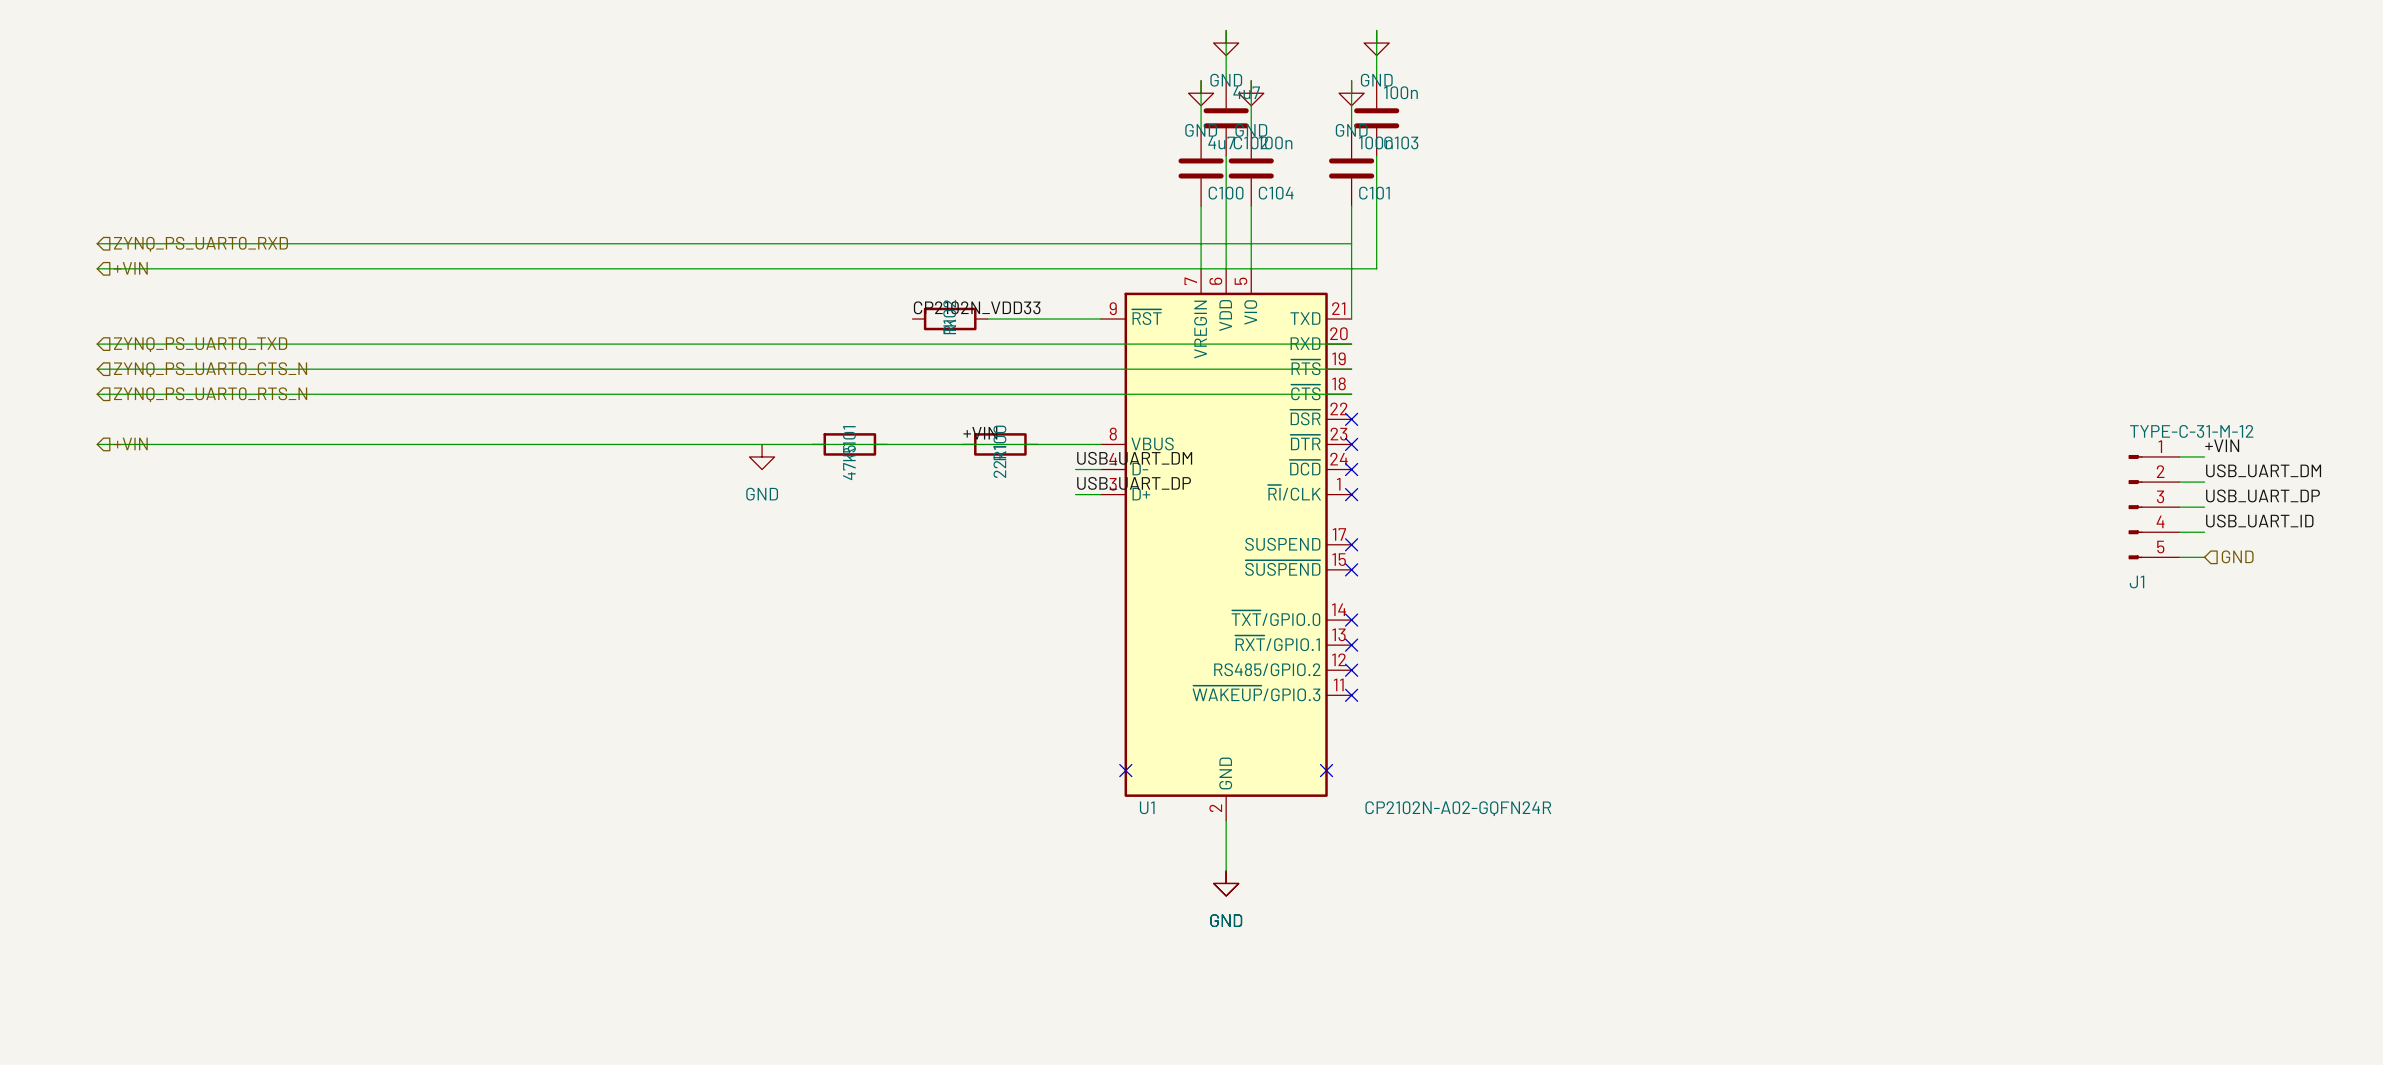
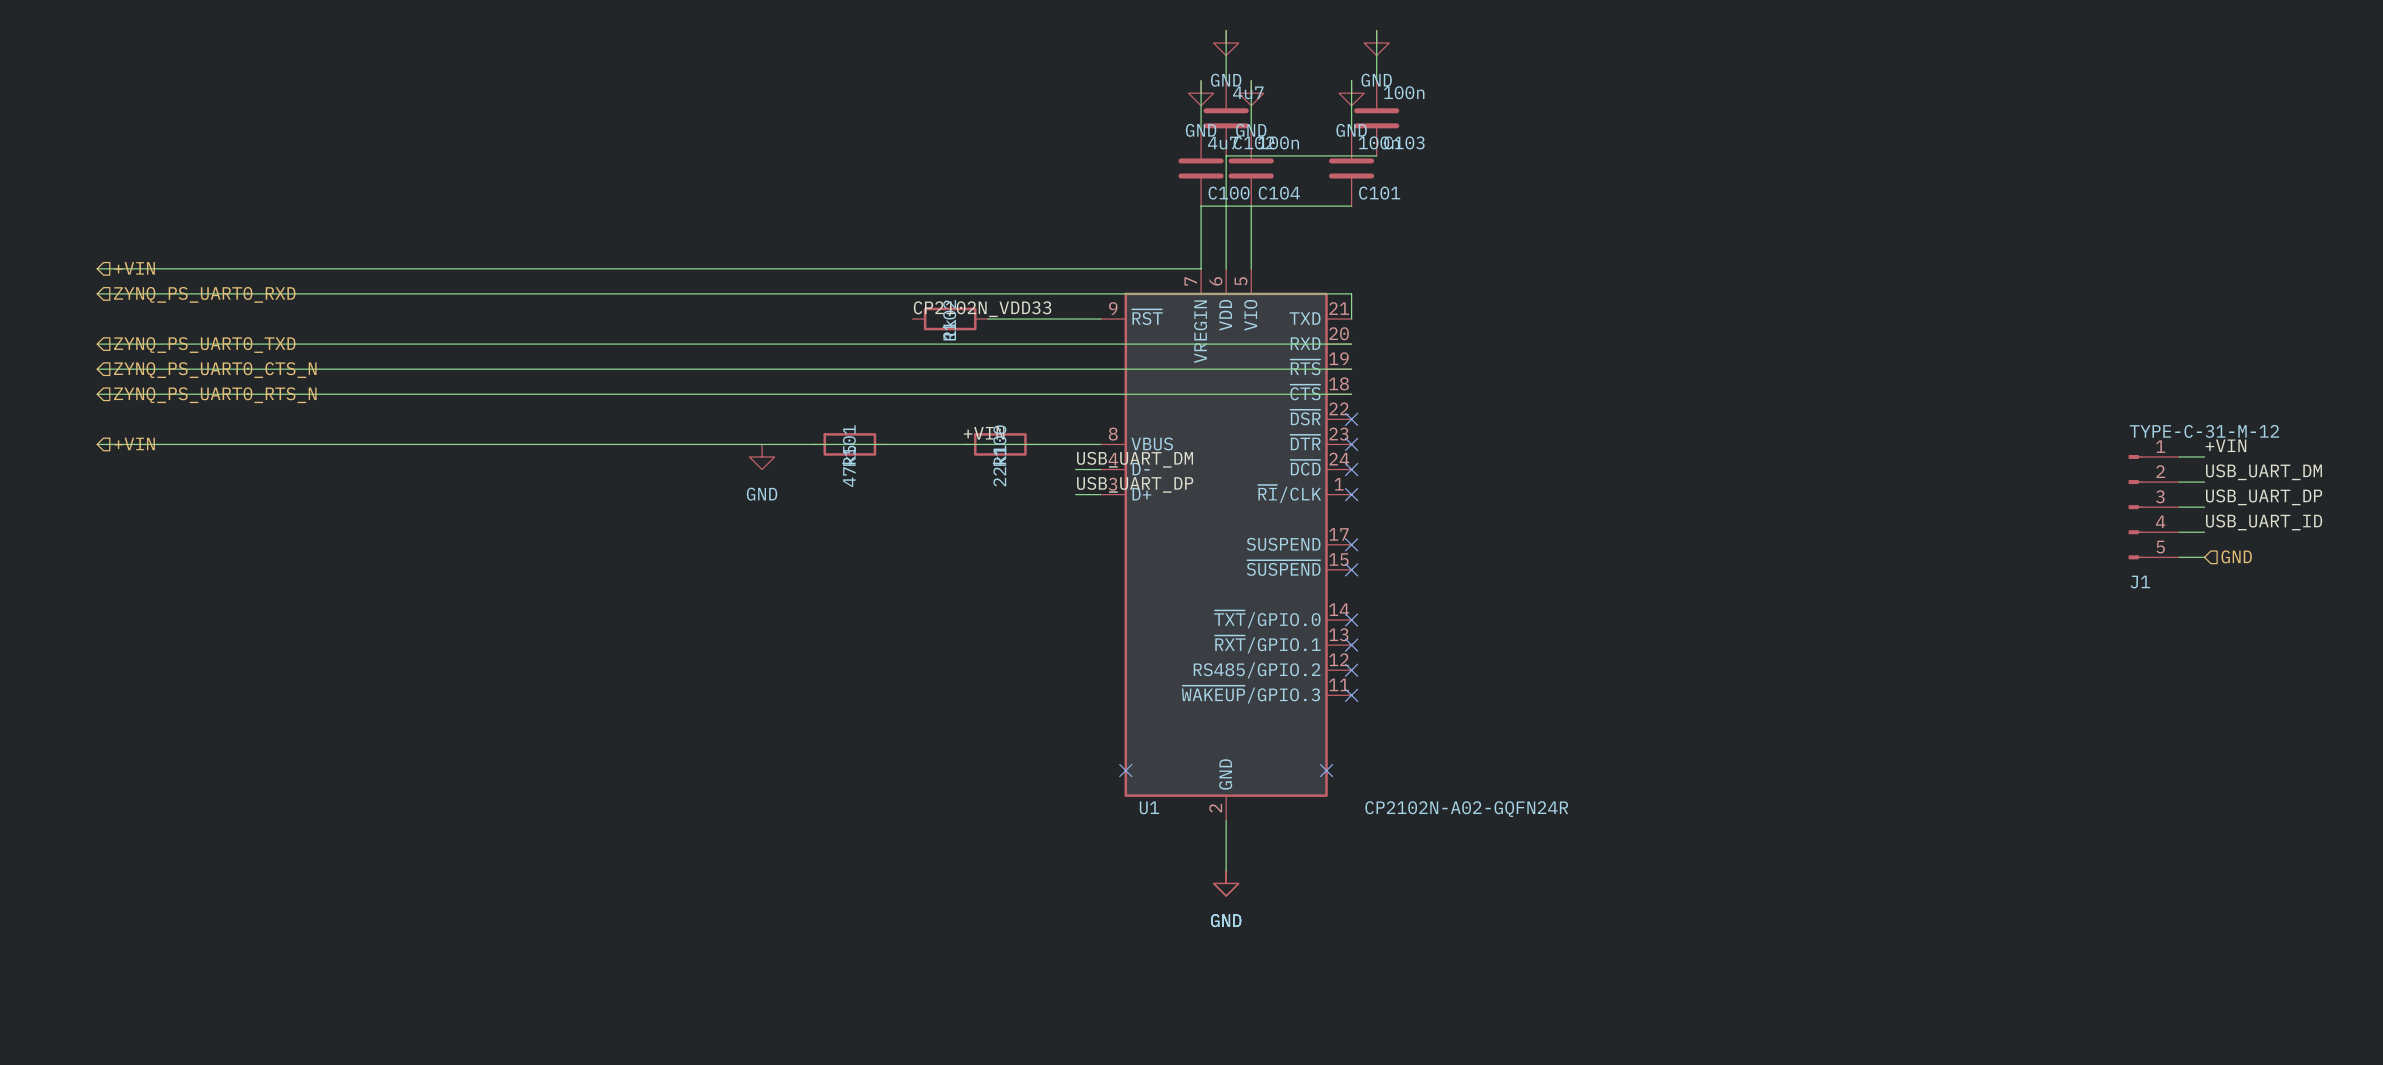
wire: (1376, 155) (1376, 268) (1201, 268) -> (1376, 155) (1226, 155)
wire: (1351, 206) (1351, 293) -> (1351, 206) (1201, 206)
wire: (97, 243) (1351, 243) -> (97, 293) (1351, 293)
hierarchical label position: ZYNQ_PS_UART0_RXD (200, 244) -> ZYNQ_PS_UART0_RXD (204, 294)

